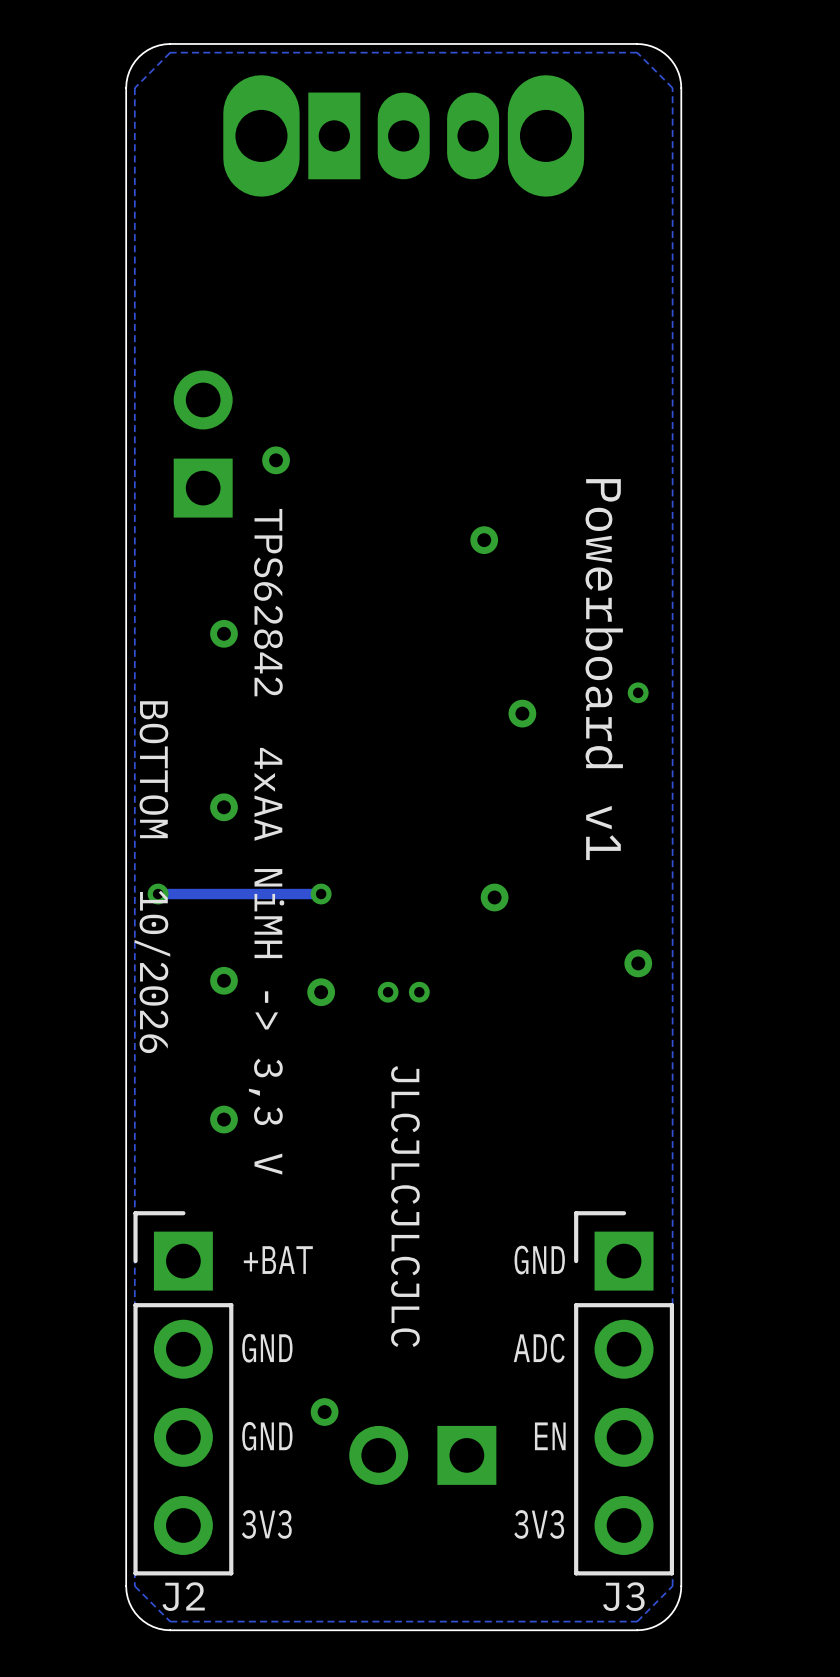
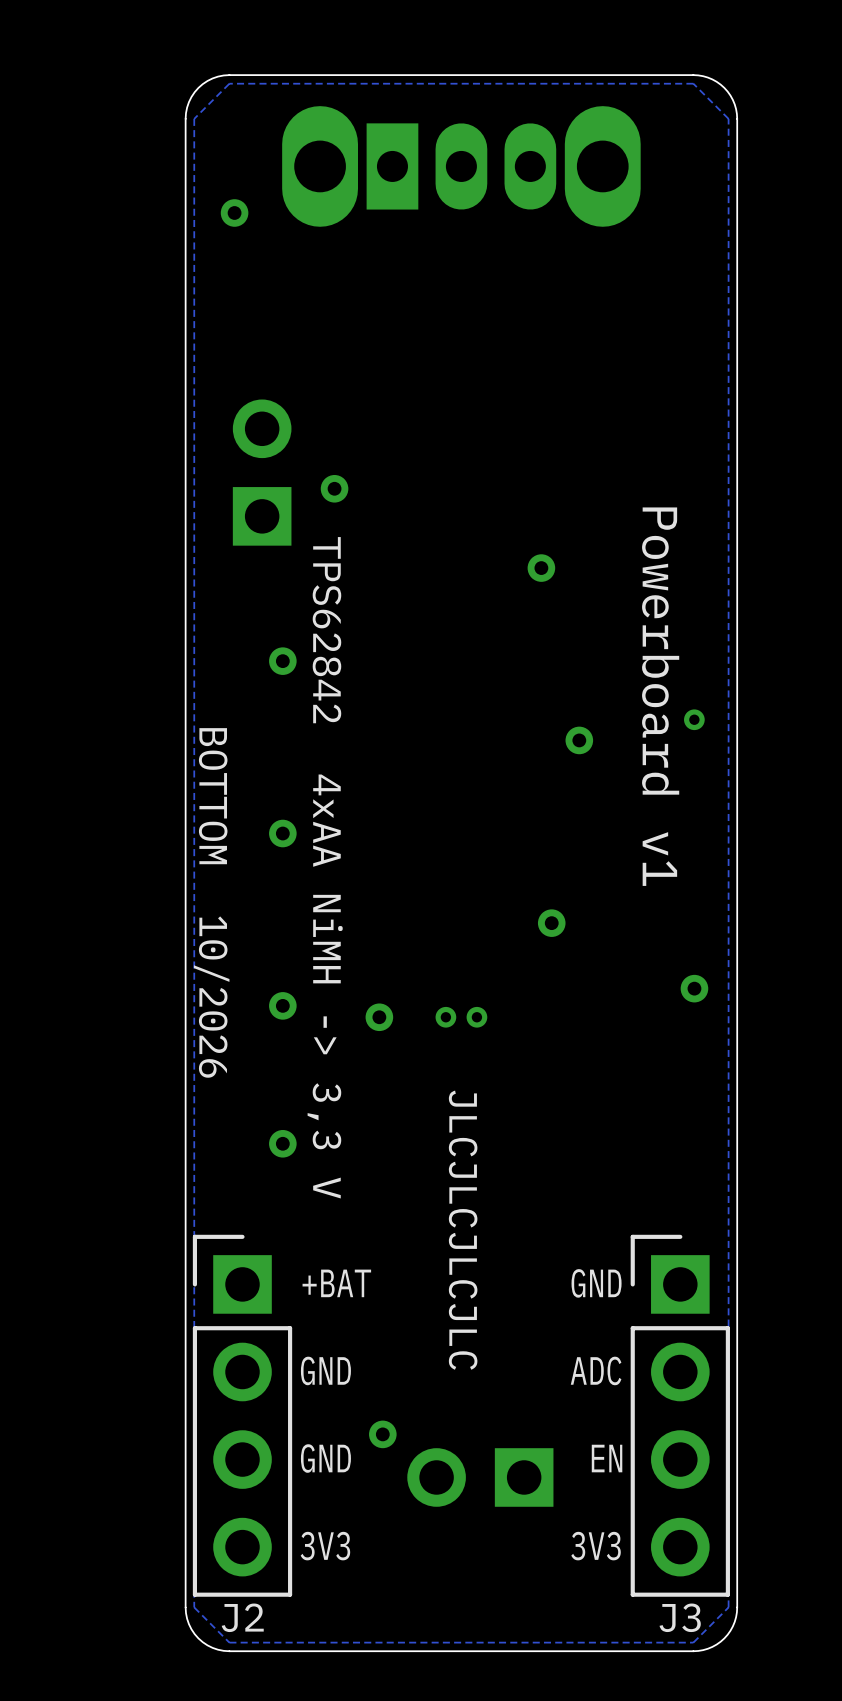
via: none -> (234, 212)
via: (158, 894) -> none
track: (321, 894) (158, 894) -> none
via: (321, 894) -> none

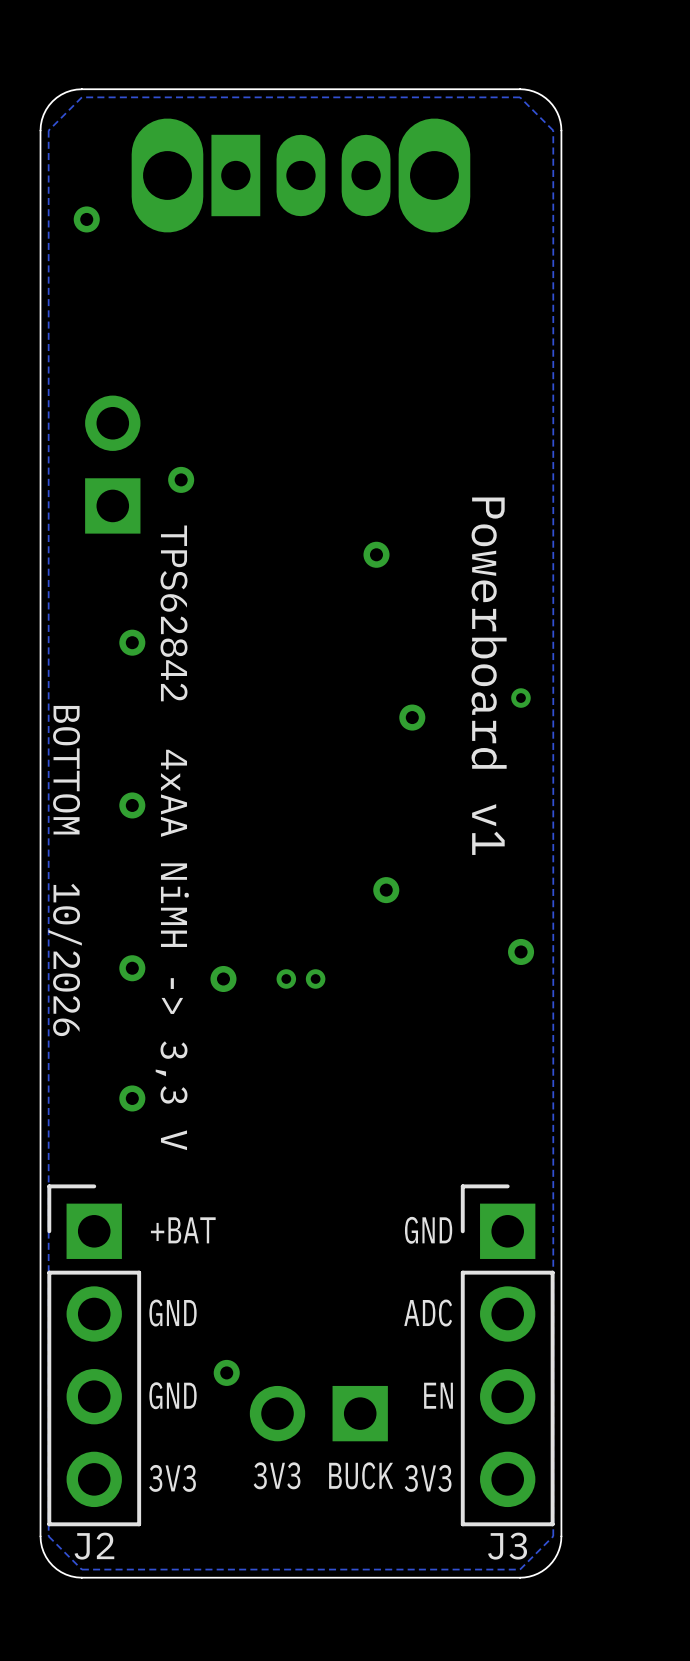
text: JLCJLCJLCJLC (463, 1230) -> none
text: none -> 3V3 (277, 1475)
text: none -> BUCK (361, 1475)

